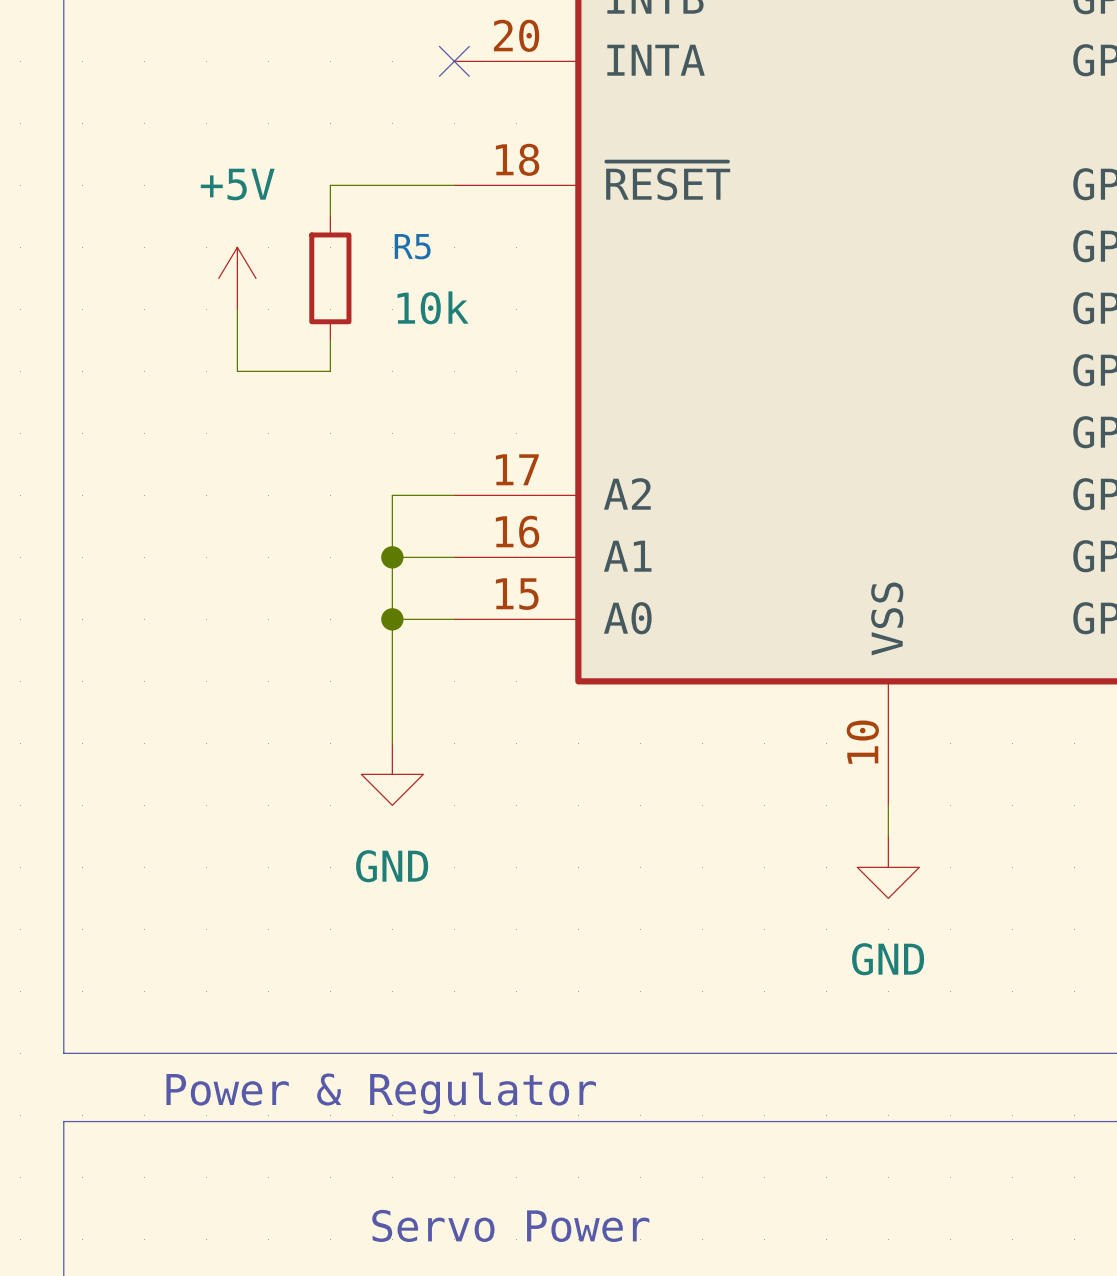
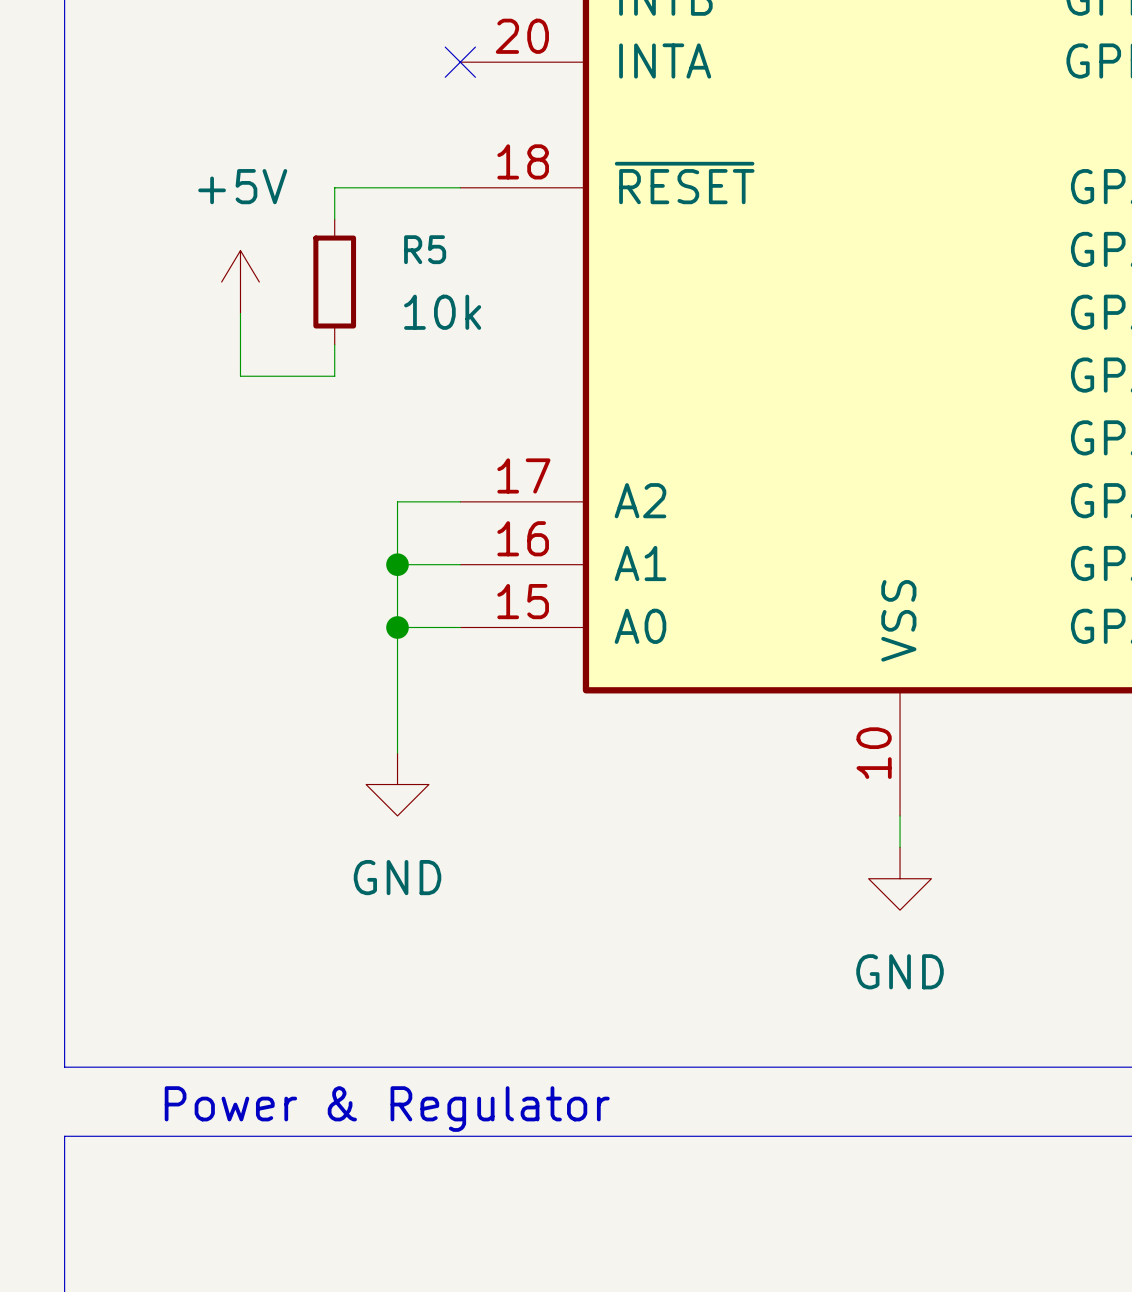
text: Servo Power (510, 1225) -> none

